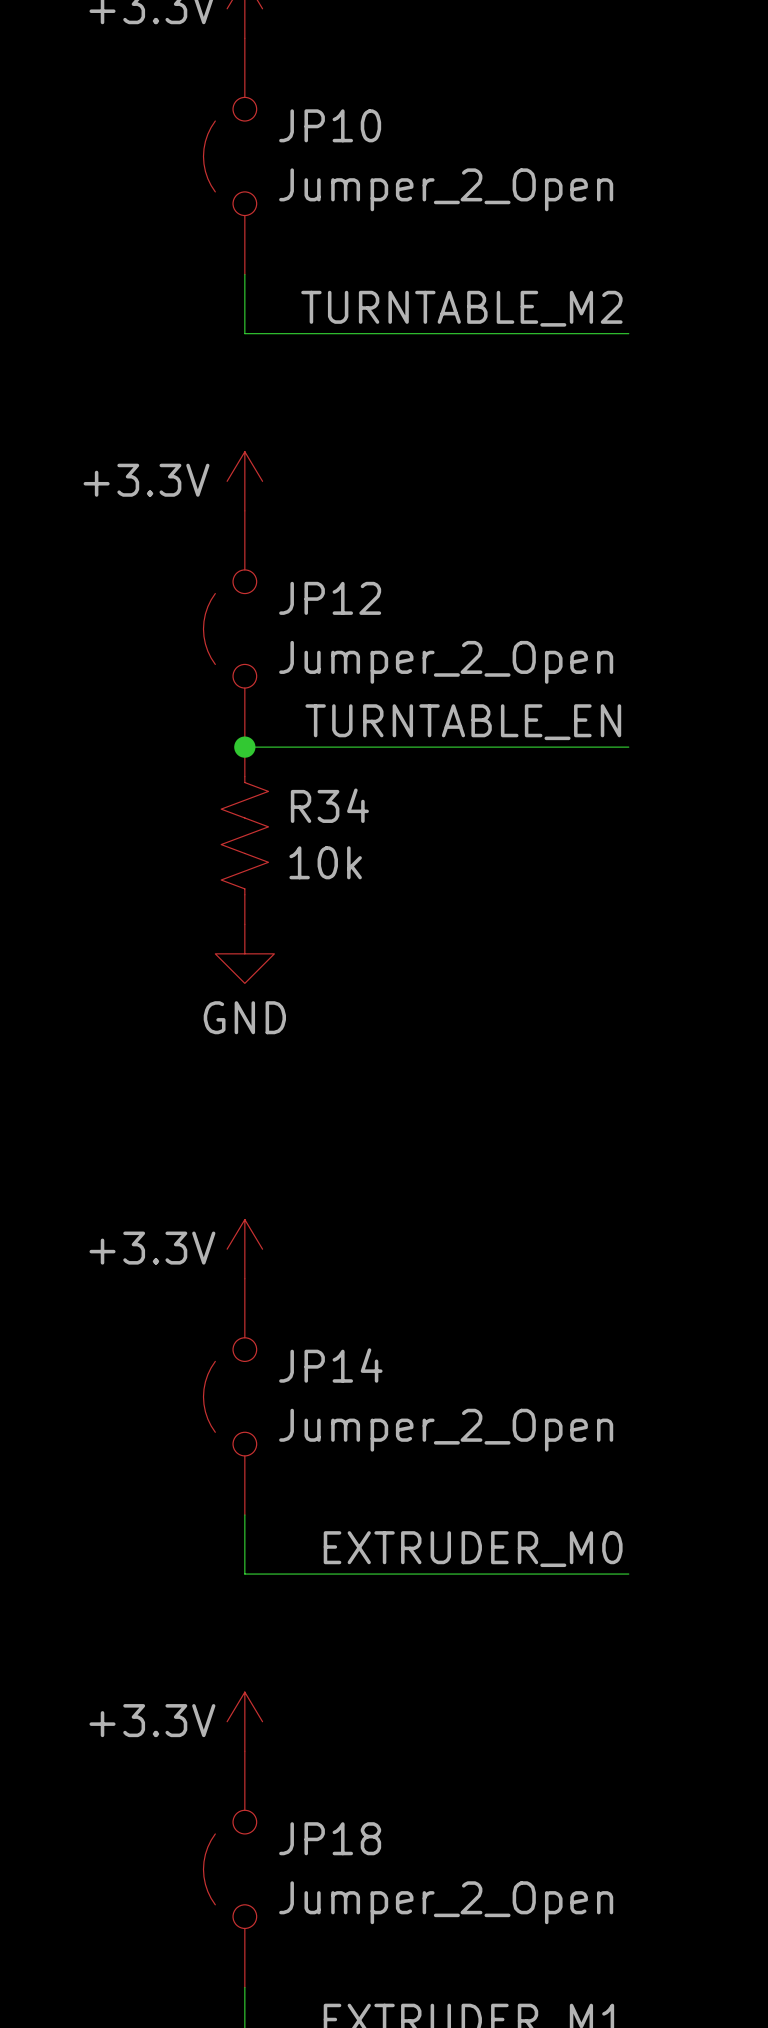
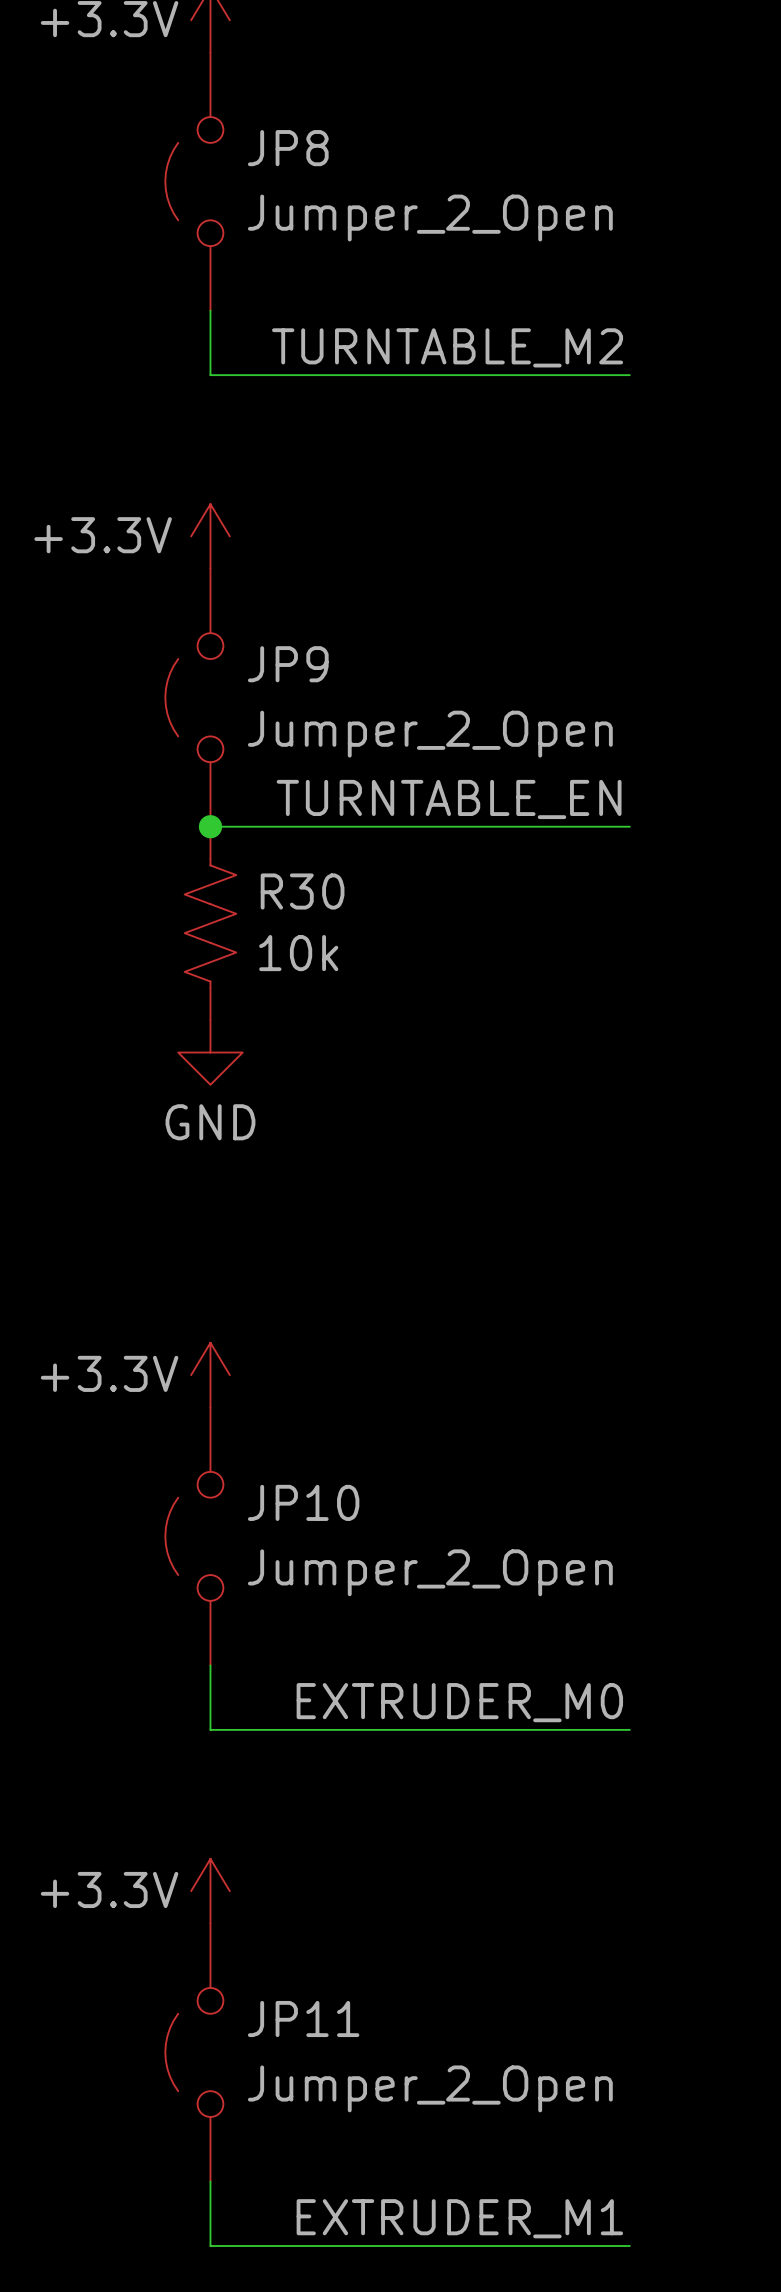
JP10 name: JP10 (330, 125) -> JP8 (288, 148)
JP12 name: JP12 (330, 598) -> JP9 (288, 664)
R34 name: R34 (329, 805) -> R30 (302, 891)
JP14 name: JP14 (330, 1365) -> JP10 (303, 1502)
JP18 name: JP18 (330, 1838) -> JP11 (303, 2018)

